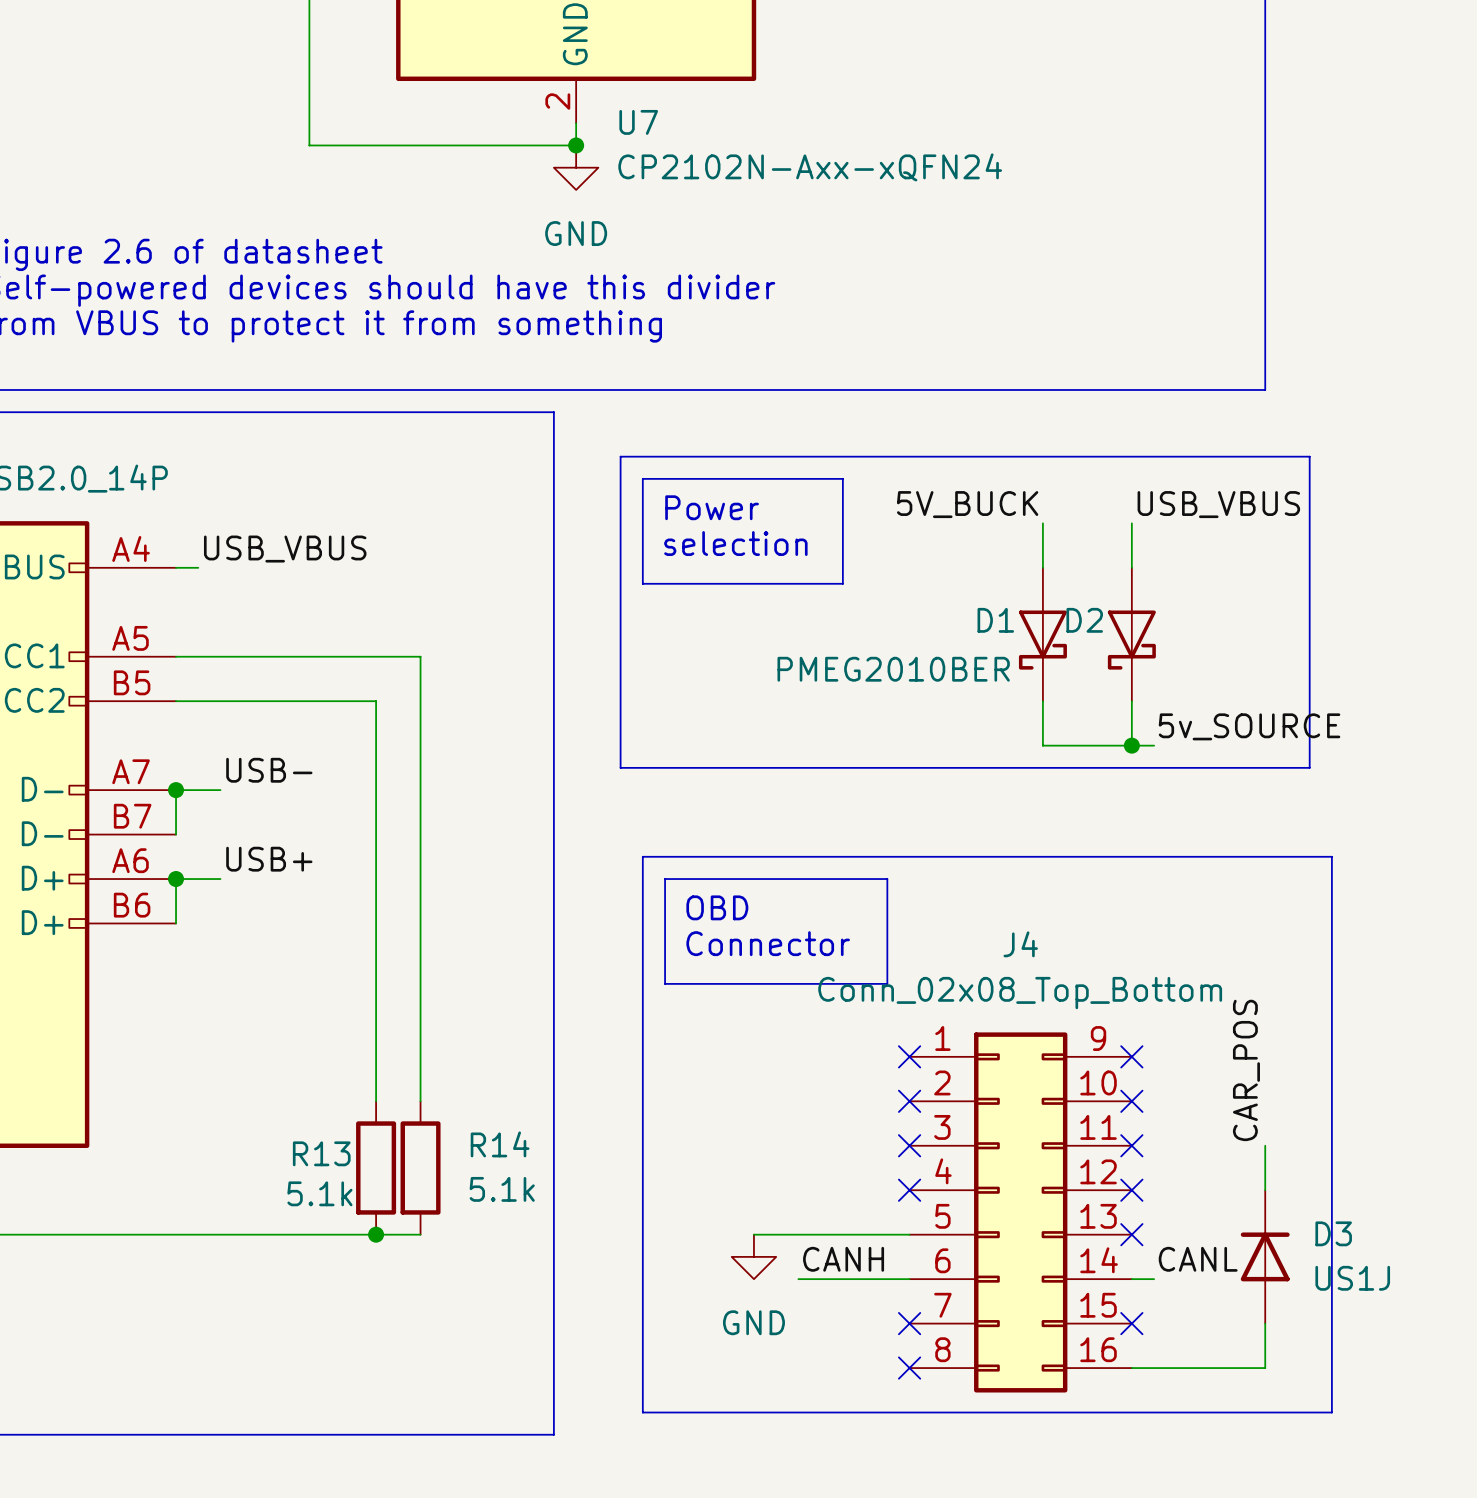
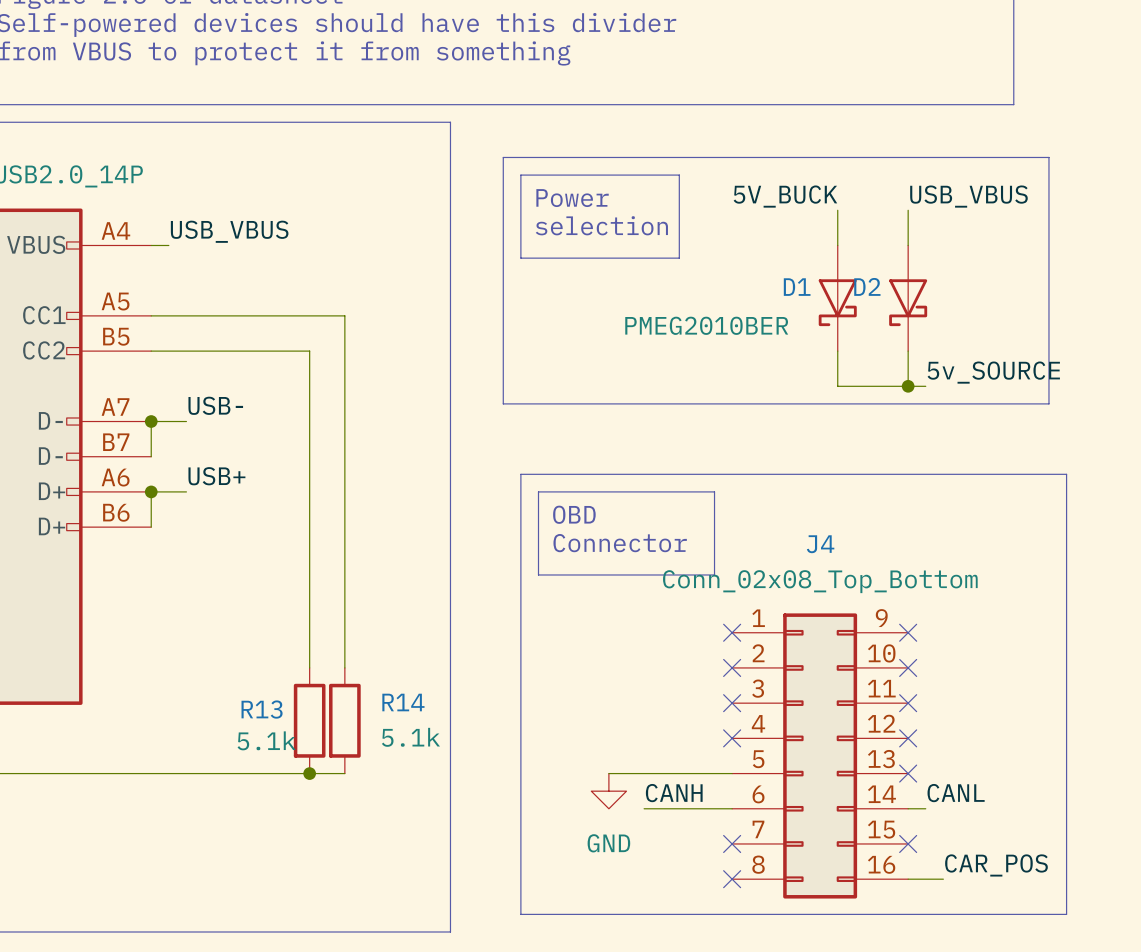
label rotation: 0° (1246, 1070) -> 90° clockwise (996, 865)
label position: CAR_POS (1246, 1070) -> CAR_POS (996, 865)
wire: (1265, 1145) (1265, 1190) -> none
D3: US1J (1265, 1256) -> none
wire: (1265, 1323) (1265, 1368) (1176, 1368) -> none

